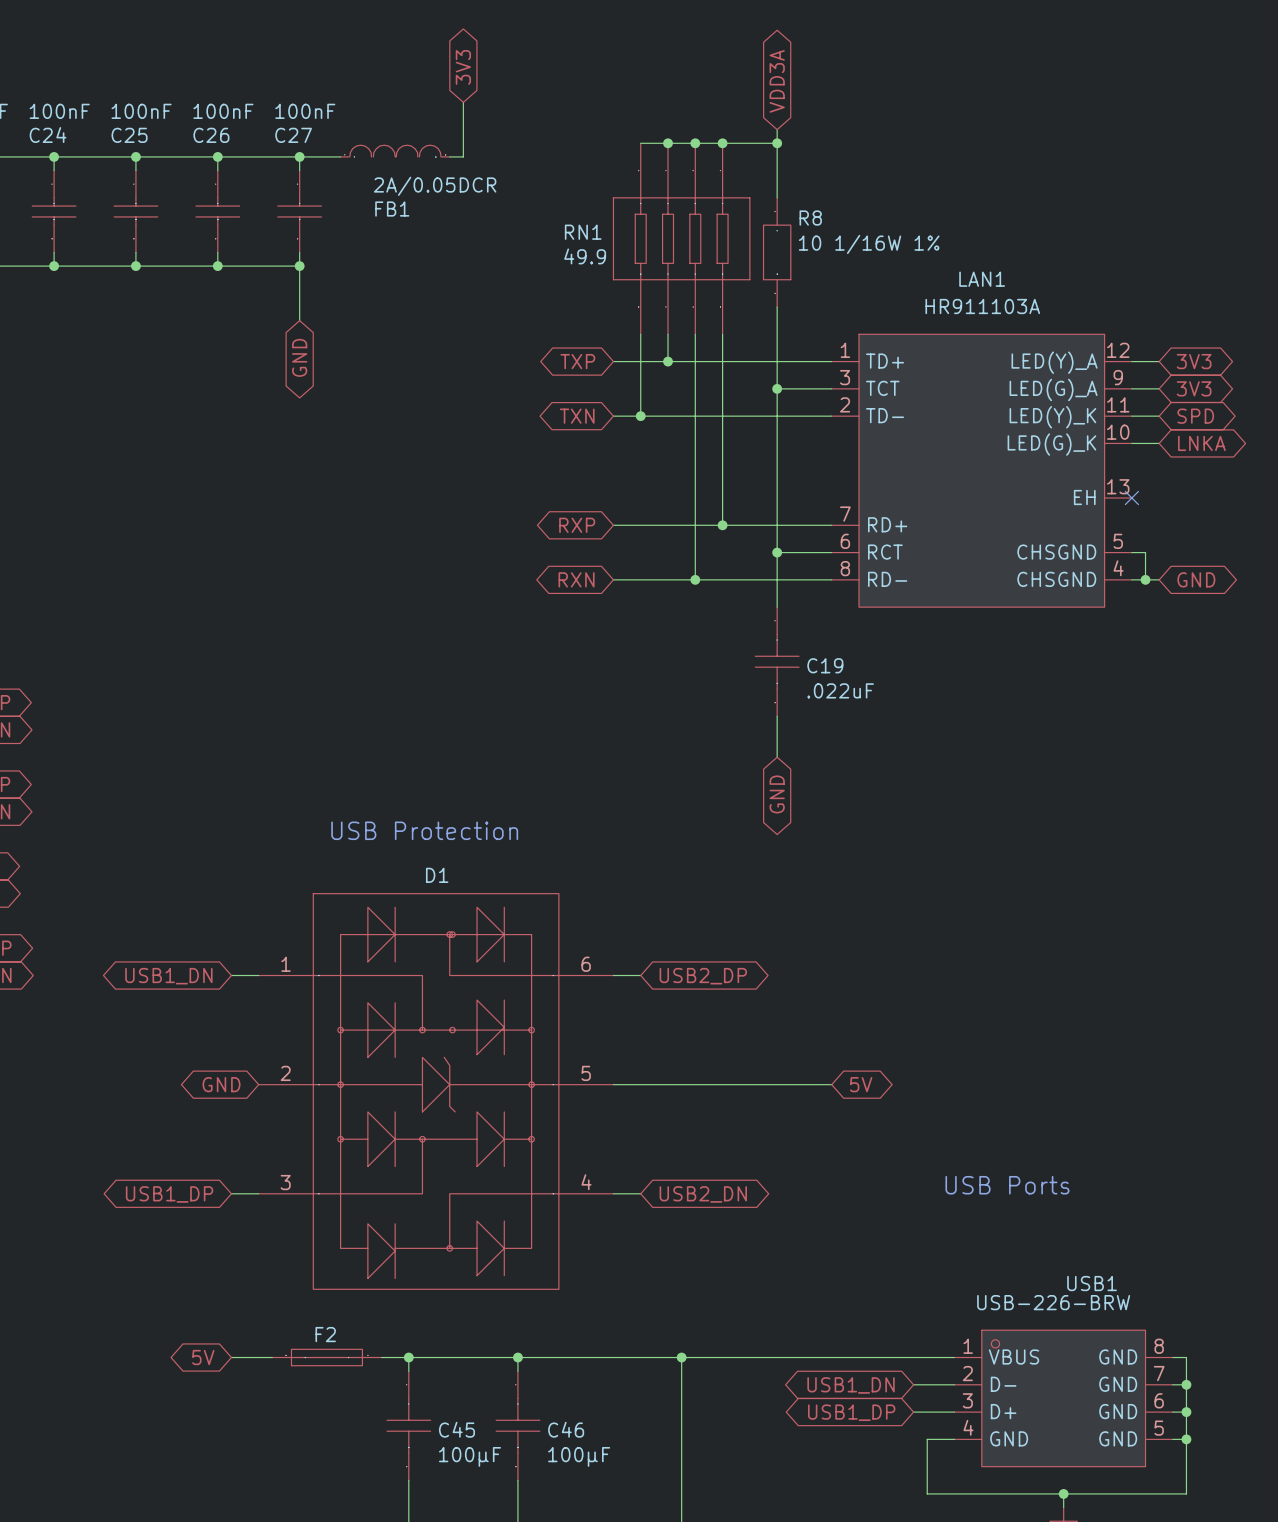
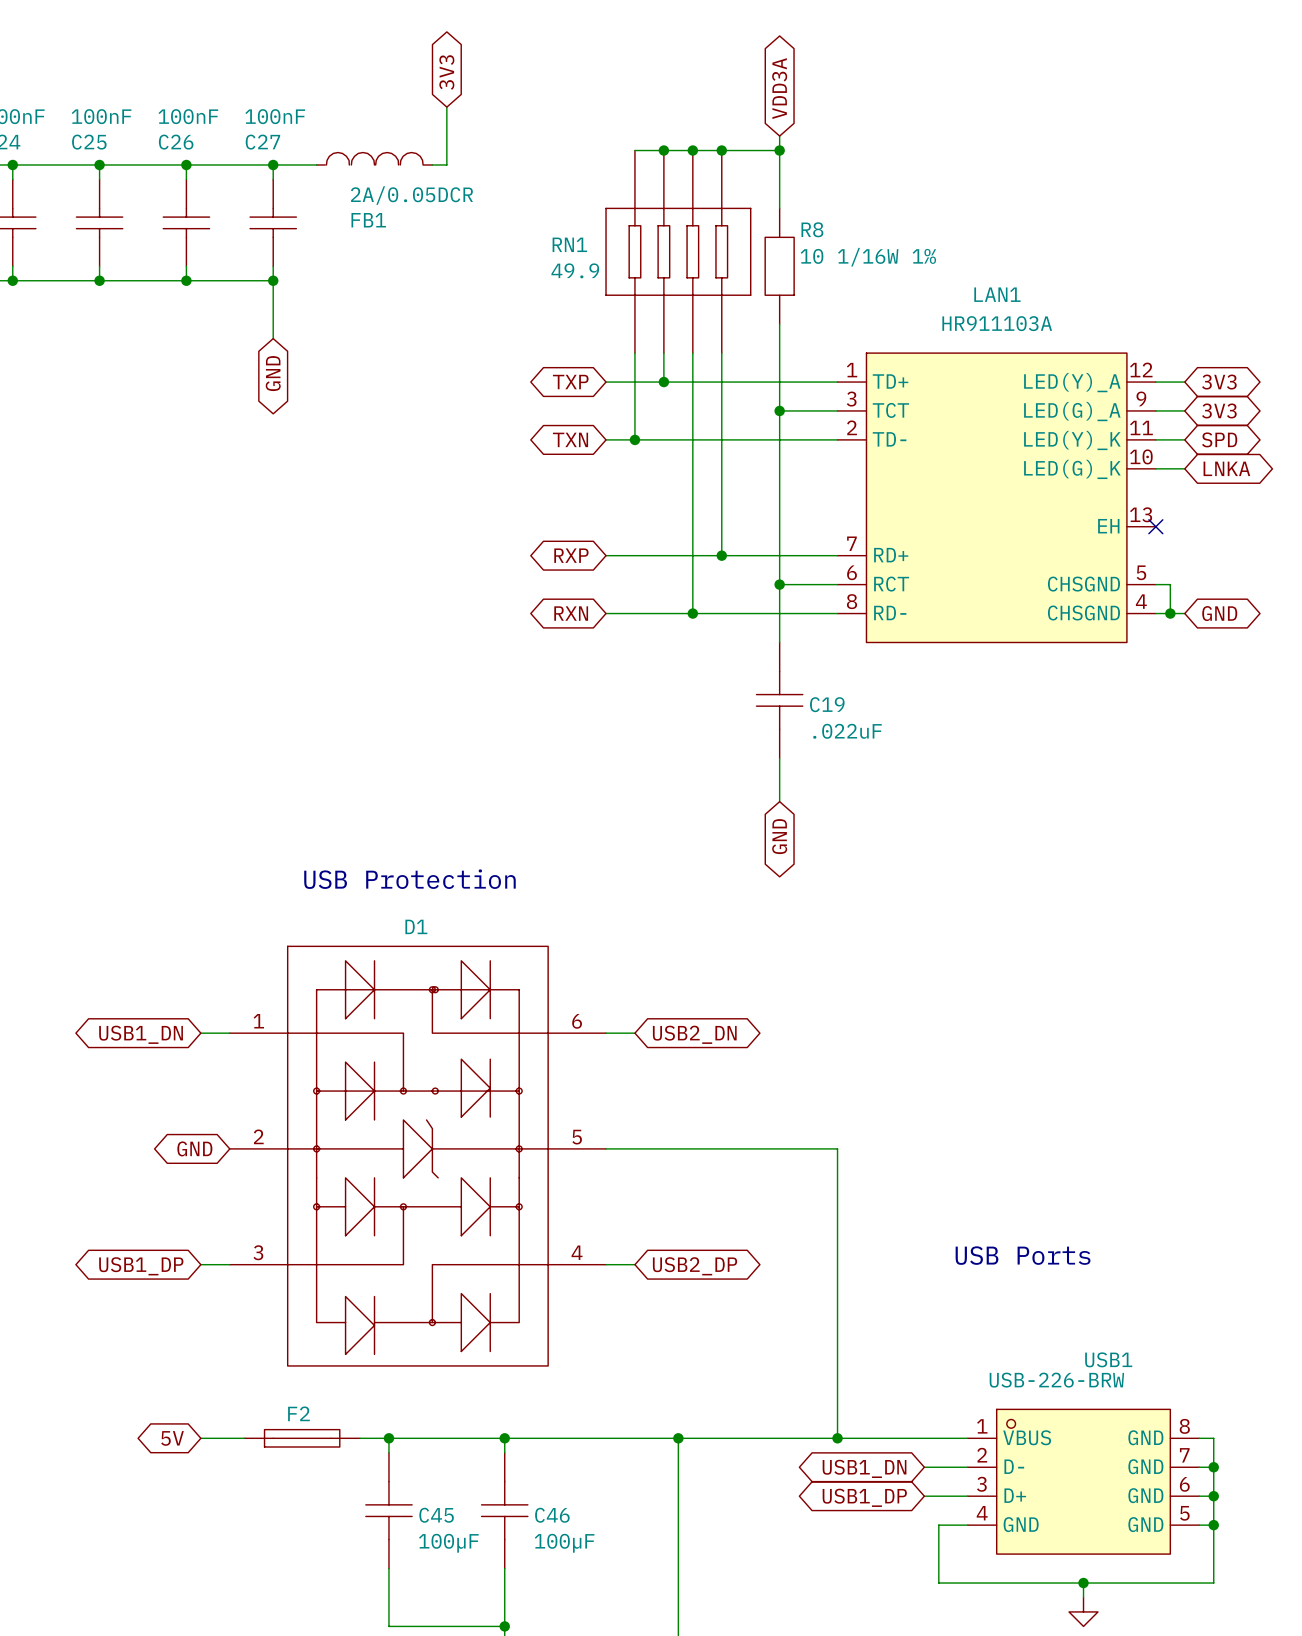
global label: USB2_DP (703, 976) -> USB2_DN (694, 1034)
wire: none -> (837, 1148) (837, 1438)
global label: 5V (861, 1084) -> none
global label: USB2_DN (703, 1194) -> USB2_DP (695, 1266)
junction: none -> (837, 1438)

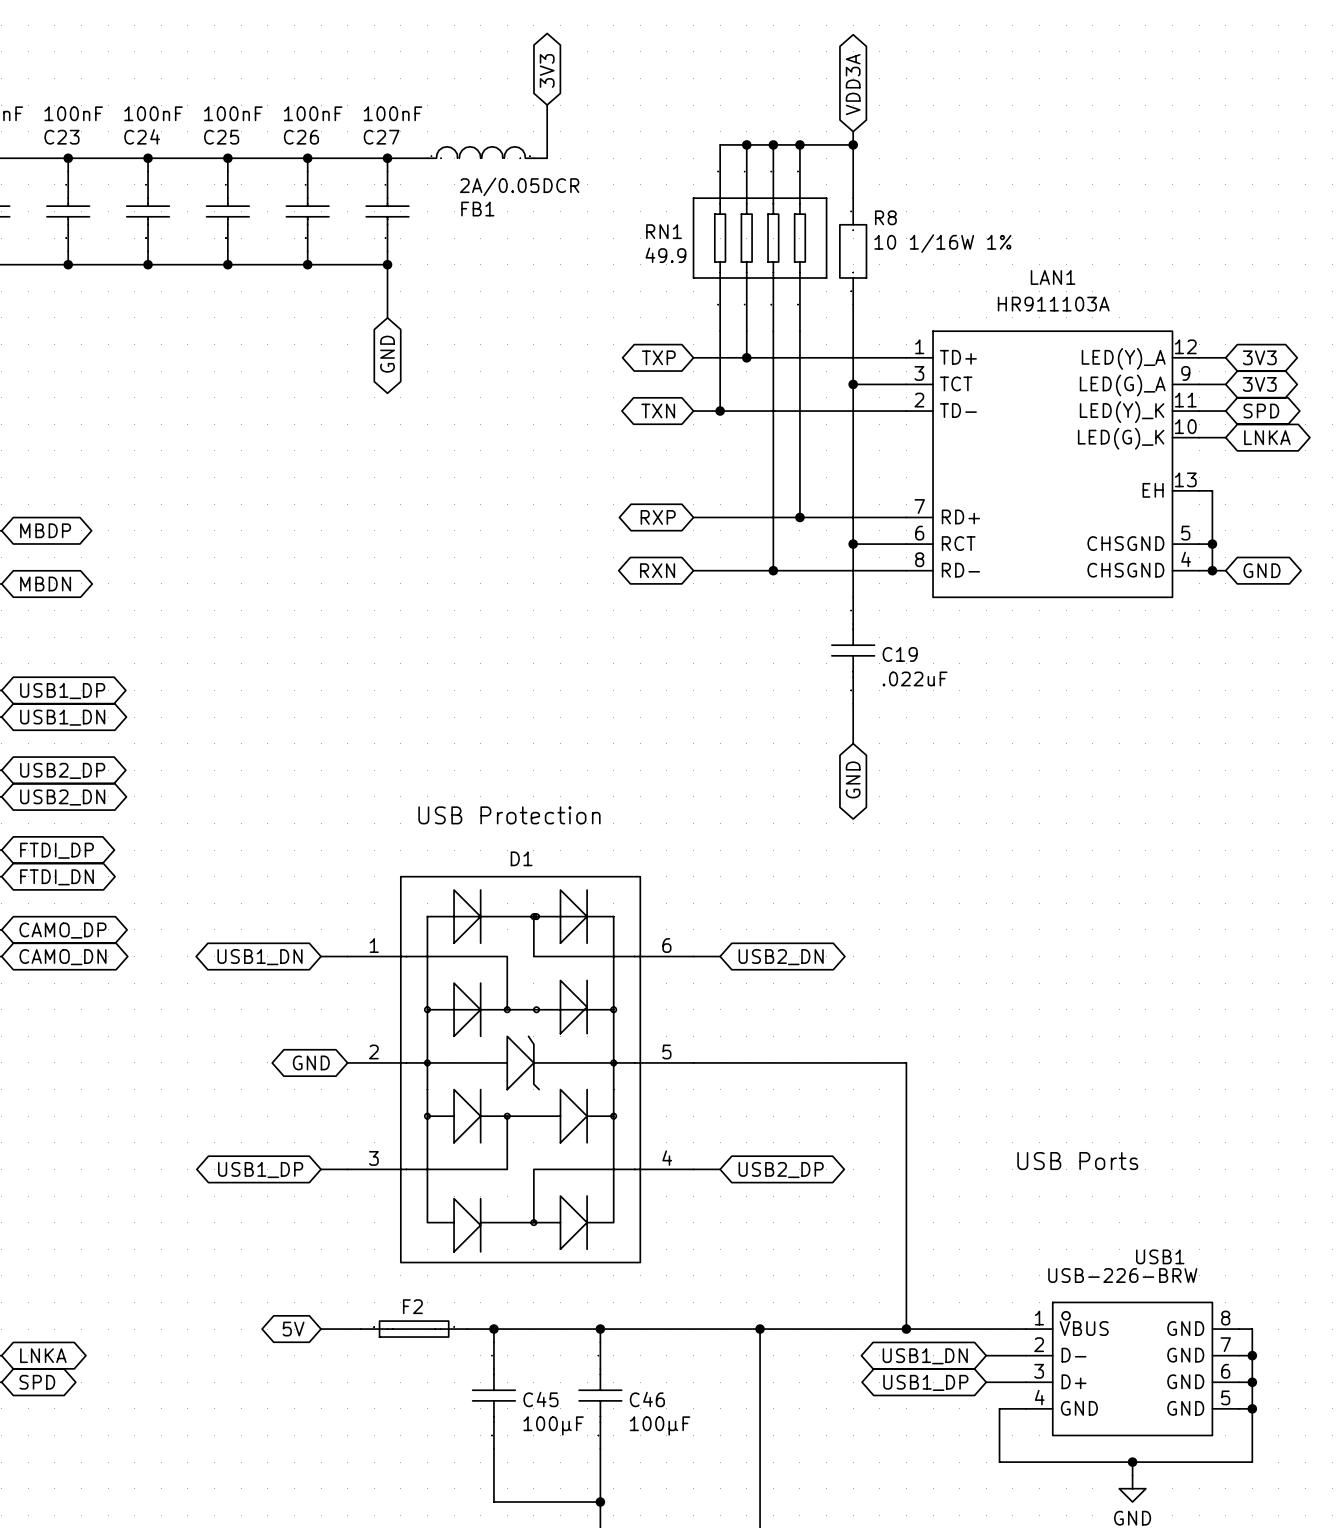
wire: none -> (1199, 490) (1212, 490) (1212, 544)
no-connect mark: (1155, 526) -> none
junction: none -> (1212, 544)

